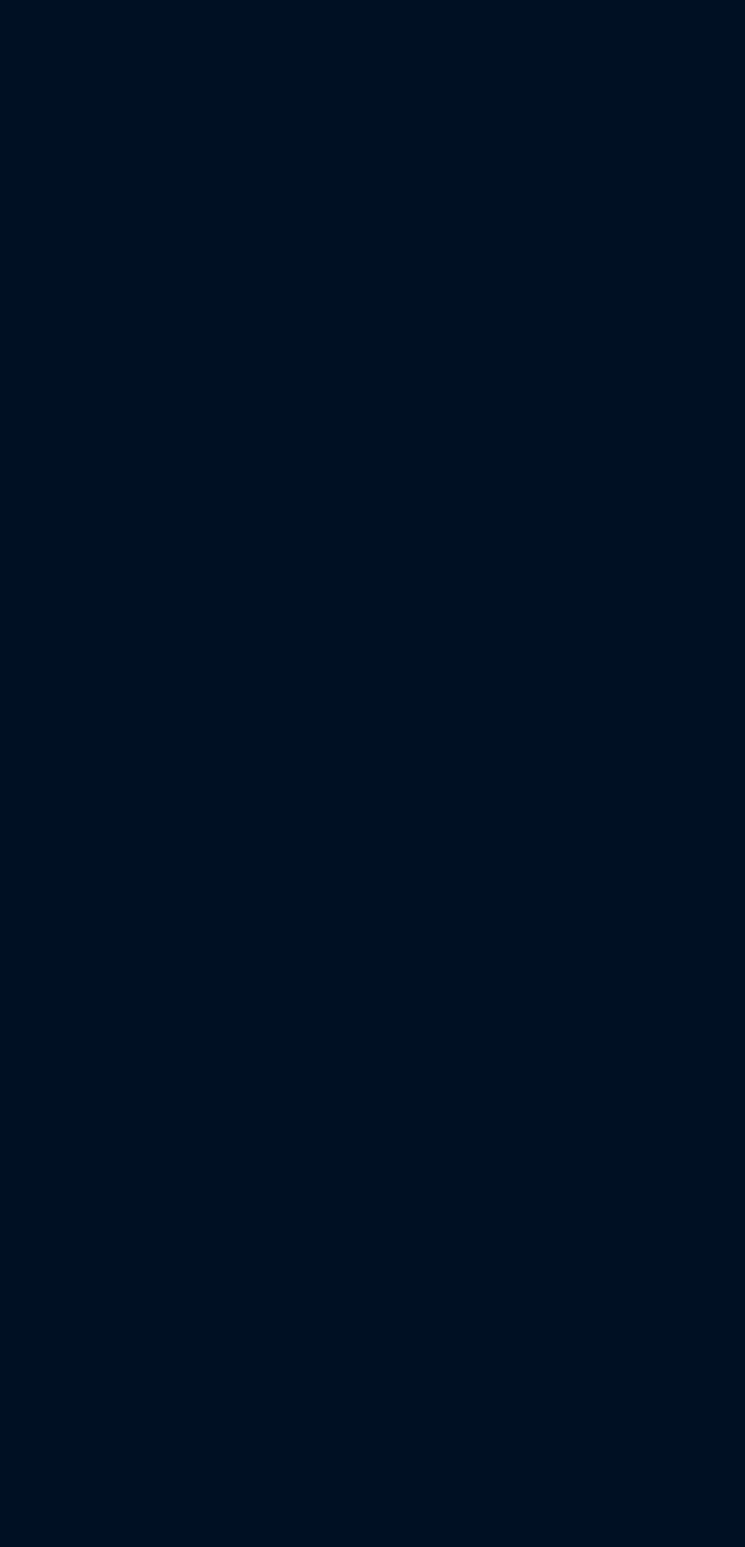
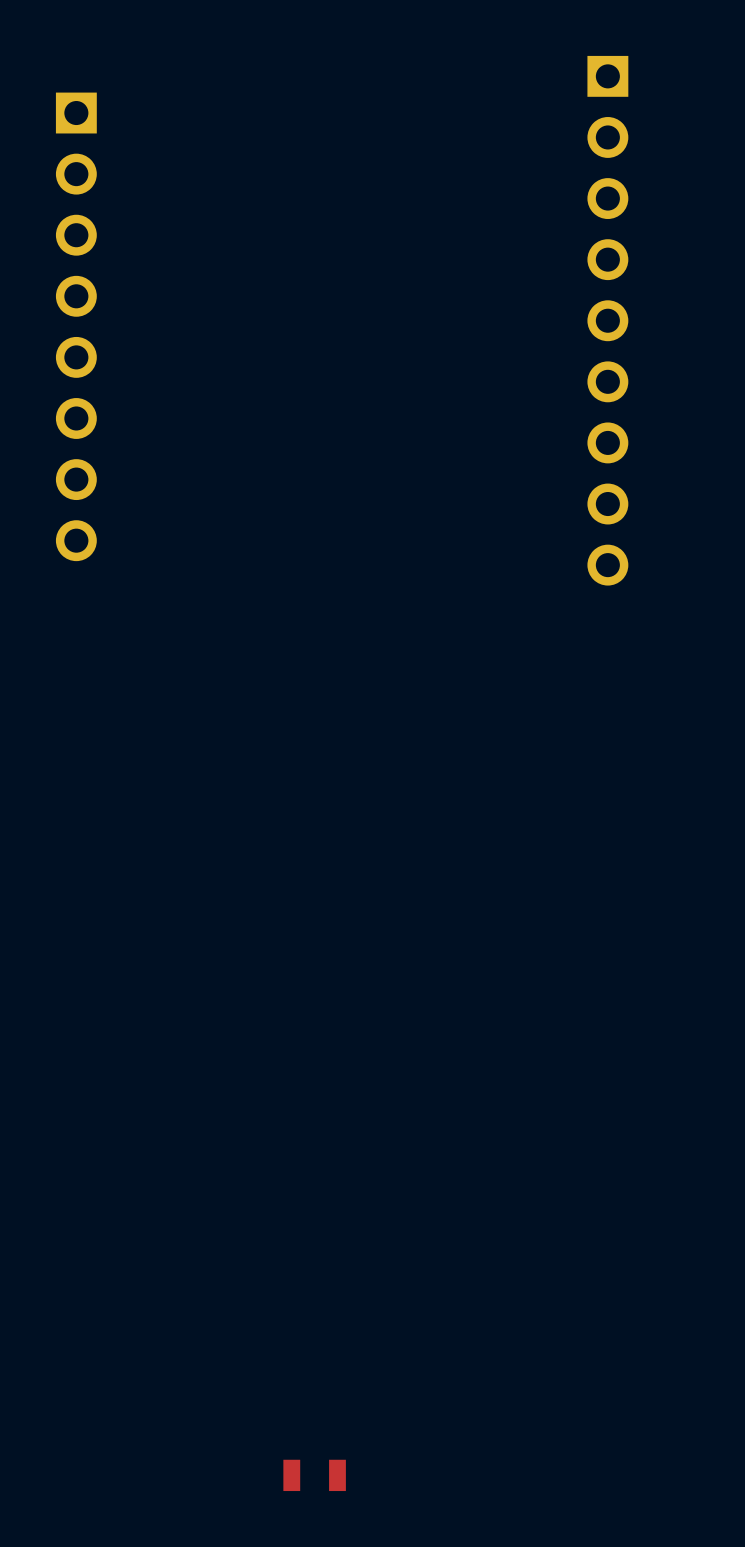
part: none -> (607, 320)
part: none -> (76, 326)
part: none -> (314, 1475)

